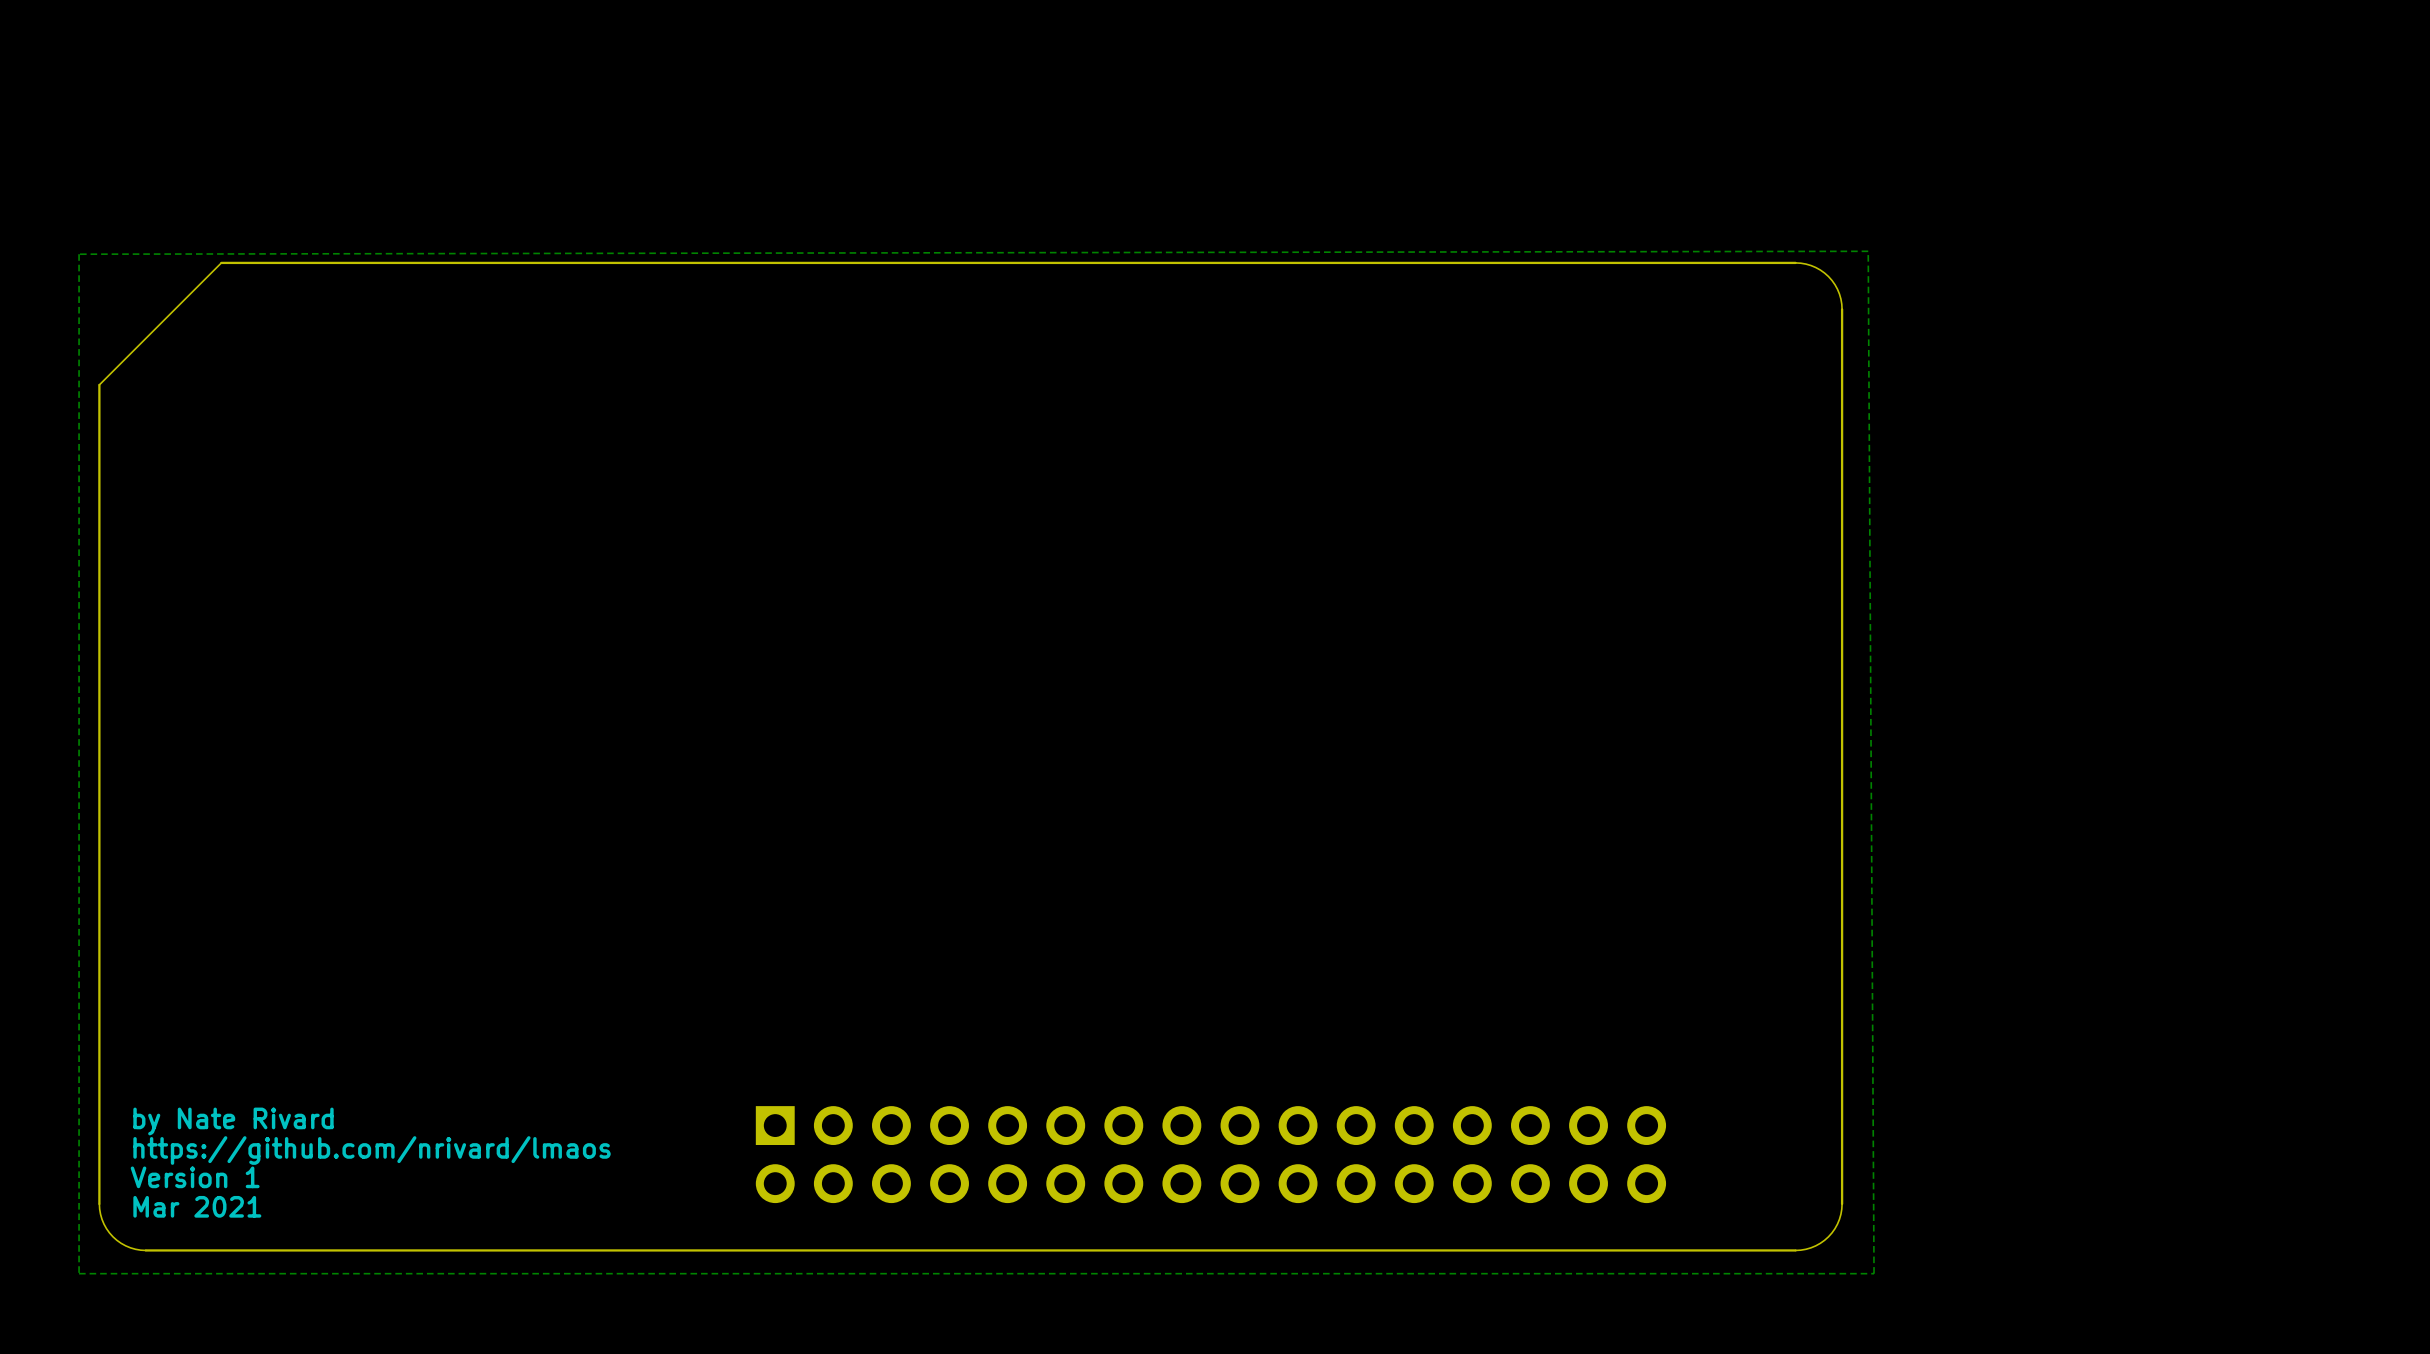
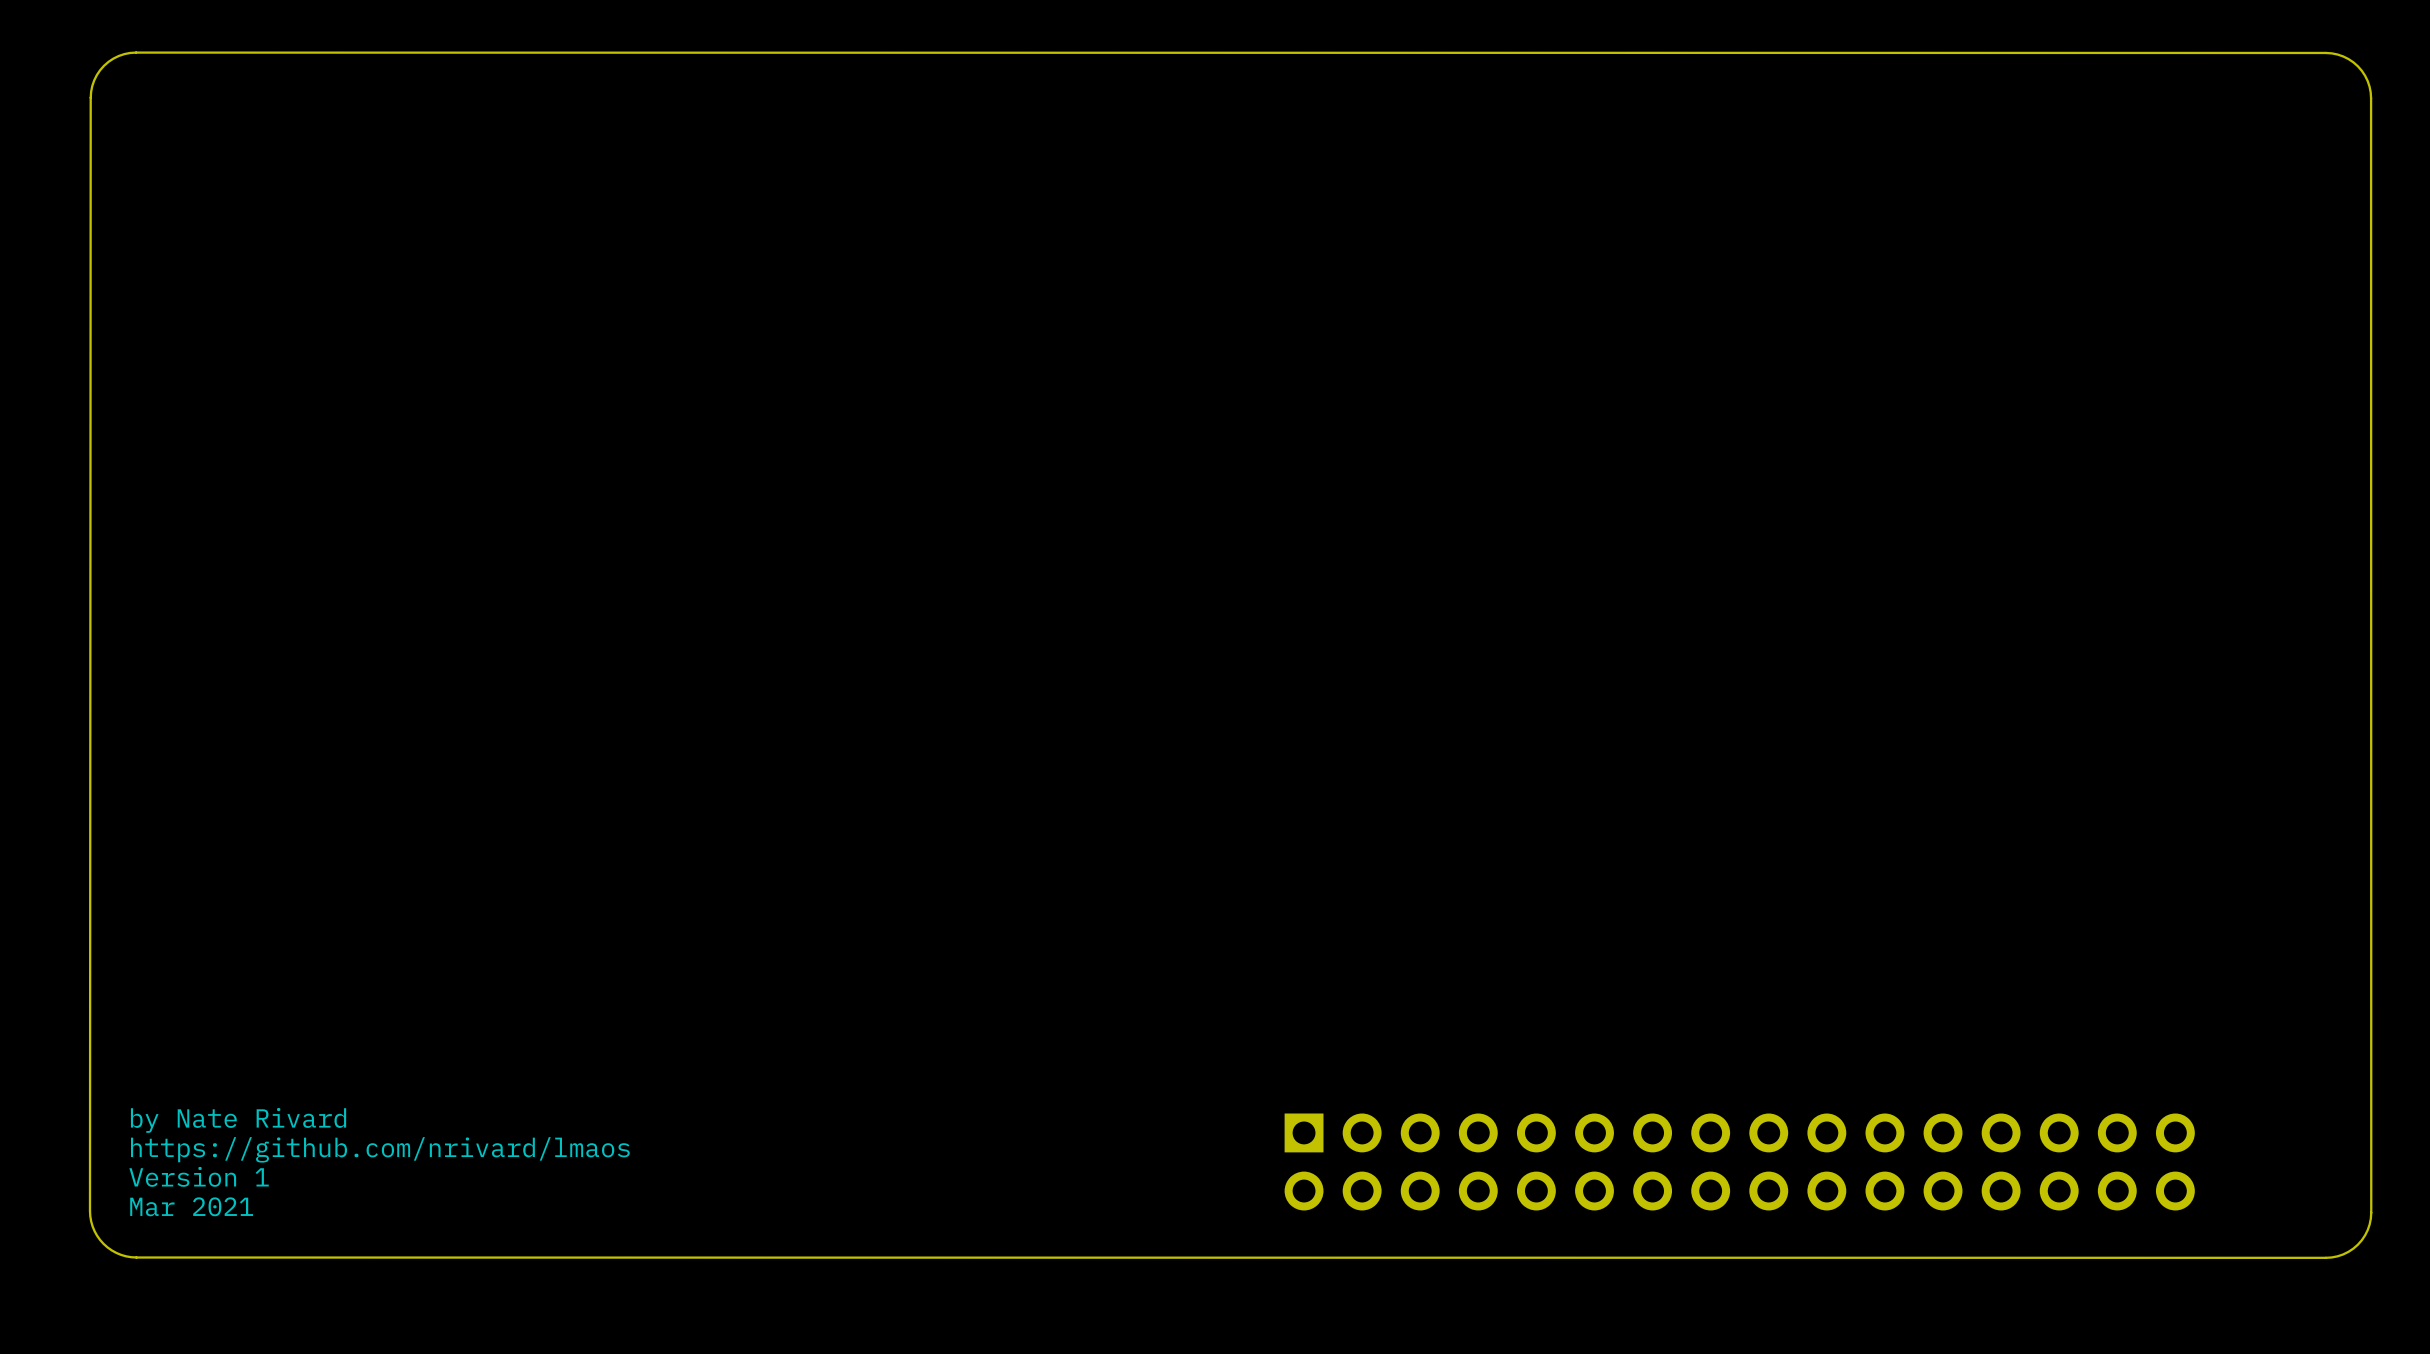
zone outline: (1868, 251) (1874, 1273) (79, 1273) (79, 254) (1868, 251) -> none
board edge: (1795, 262) (221, 262) (99, 384) (99, 1203) (100, 1214) (106, 1228) (121, 1243) (130, 1247) (145, 1250) (1795, 1250) (1805, 1249) (1820, 1243) (1831, 1232) (1837, 1224) (1842, 1203) (1842, 309) (1837, 289) (1828, 276) (1815, 267) (1795, 262) -> (136, 52) (2325, 52) (2337, 54) (2348, 59) (2357, 66) (2365, 75) (2369, 86) (2371, 98) (2371, 1212) (2369, 1224) (2365, 1235) (2357, 1244) (2348, 1251) (2337, 1256) (2325, 1257) (136, 1257) (116, 1252) (103, 1243) (97, 1235) (91, 1221) (90, 1211) (90, 97) (94, 80) (104, 65) (118, 55) (136, 52)
part position: (1210, 1154) -> (1739, 1161)

